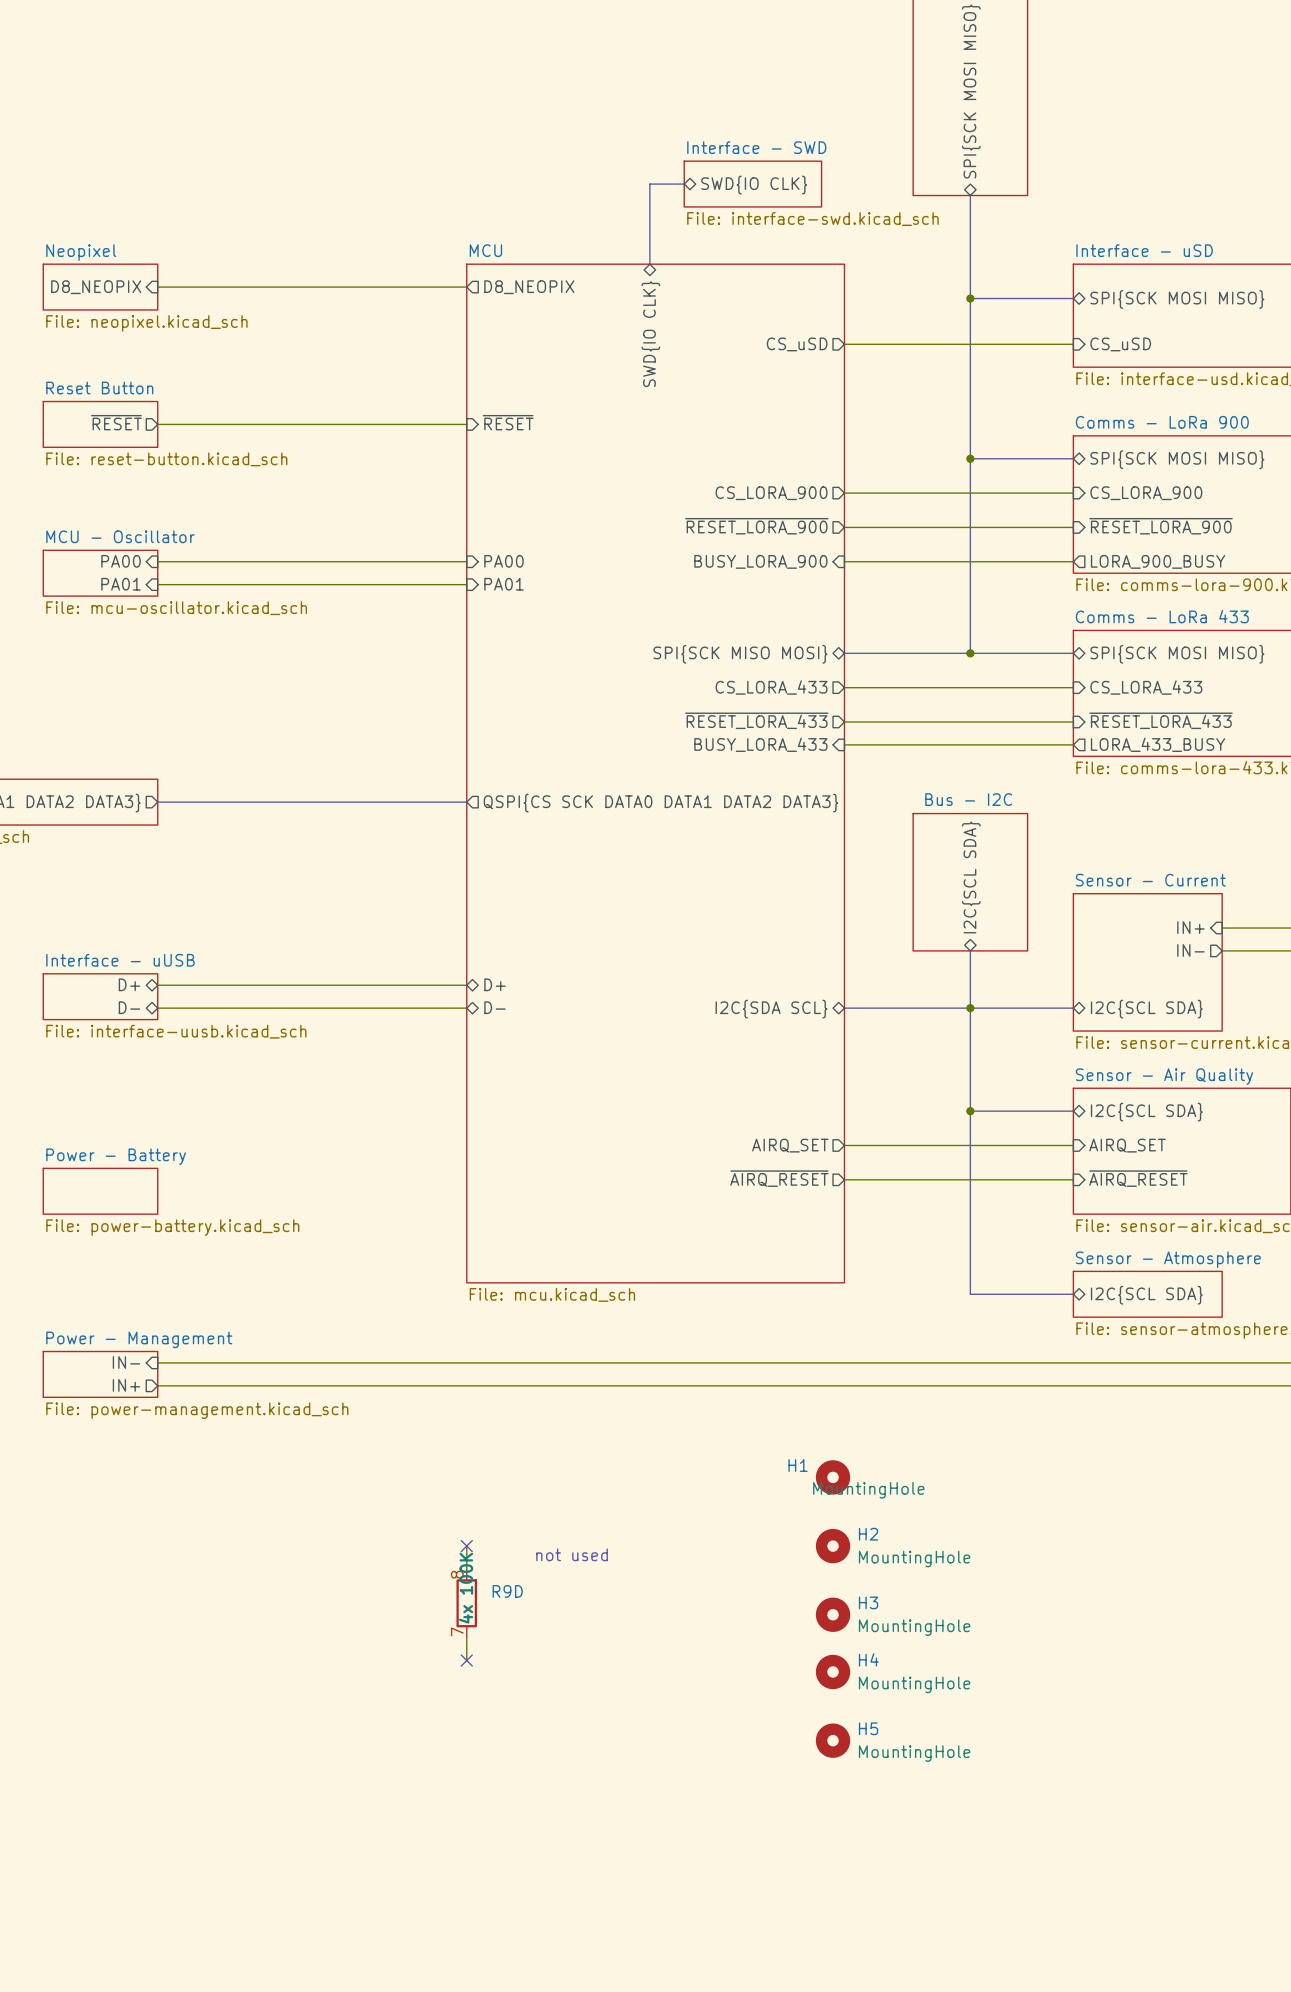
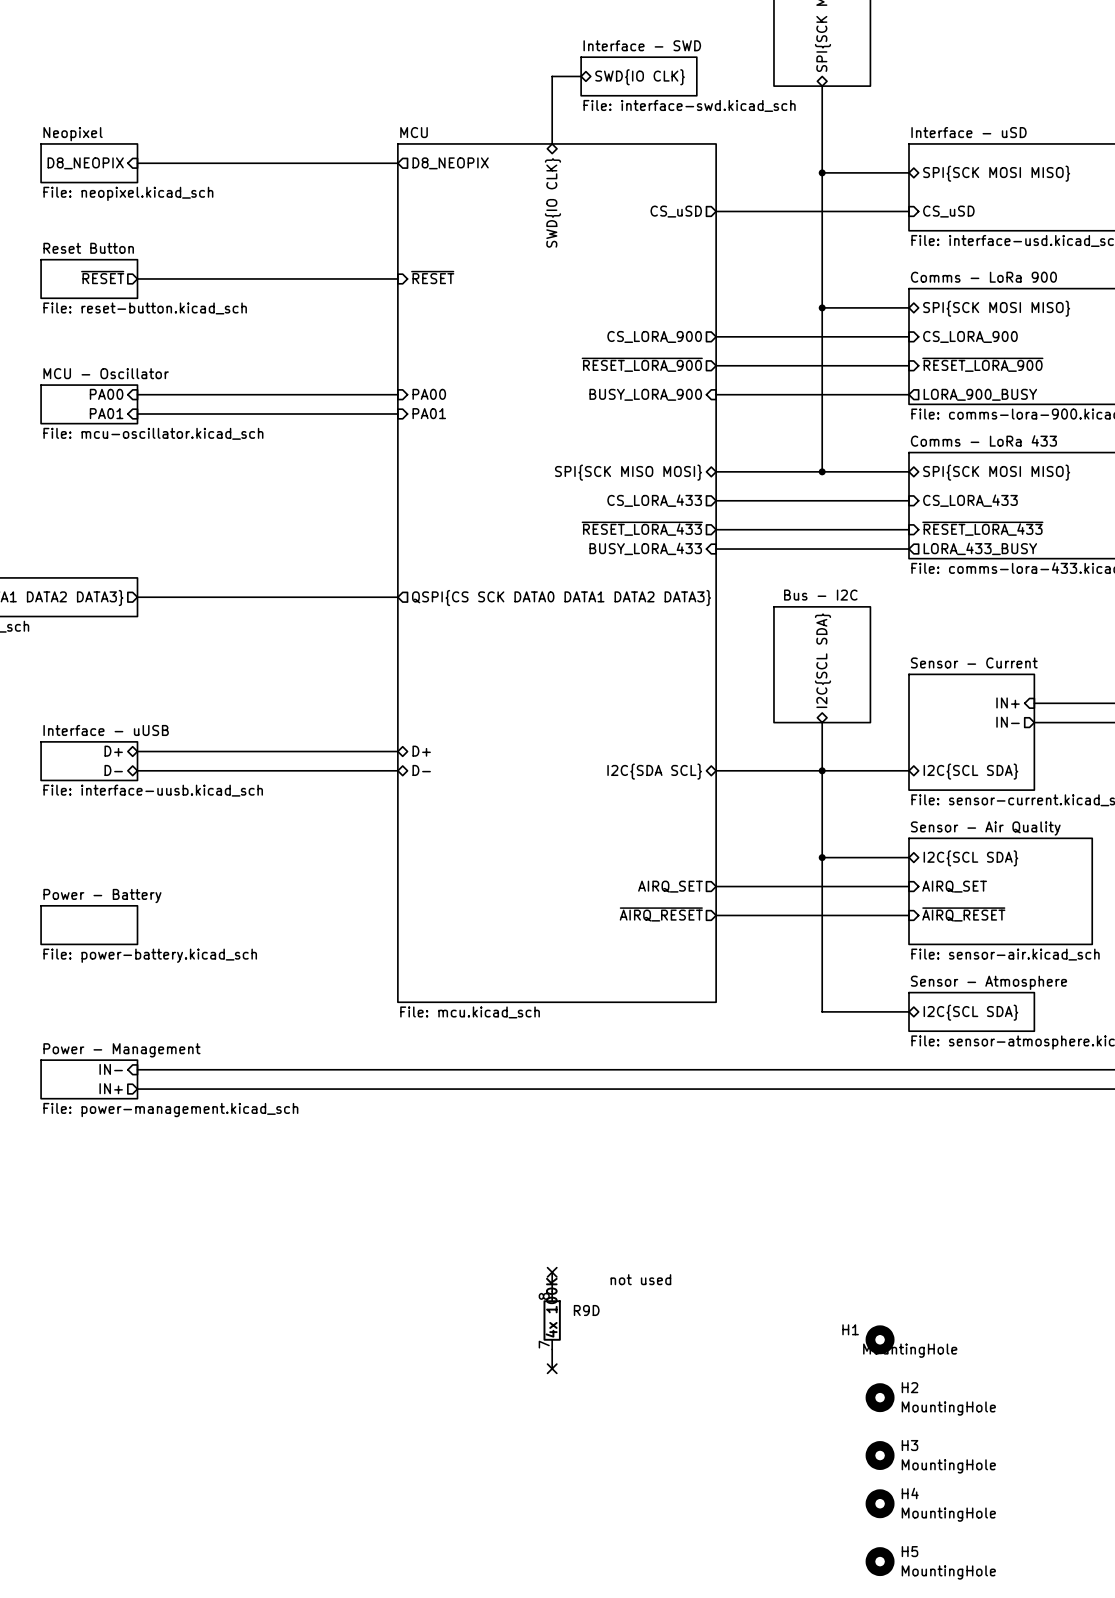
H1 position: (833, 1477) -> (880, 1339)
wire: (466, 1546) (466, 1568) -> (552, 1272) (552, 1291)
no-connect mark: (466, 1546) -> none
H2 position: (833, 1546) -> (880, 1397)
text position: not used (572, 1554) -> not used (640, 1279)
R9D position: (466, 1603) -> (552, 1320)
no-connect mark: none -> (552, 1272)
H3 position: (833, 1614) -> (880, 1455)
wire: (466, 1637) (466, 1660) -> (552, 1349) (552, 1368)
no-connect mark: (466, 1660) -> none
H4 position: (833, 1671) -> (880, 1503)
no-connect mark: none -> (552, 1368)
H5 position: (833, 1740) -> (880, 1561)

